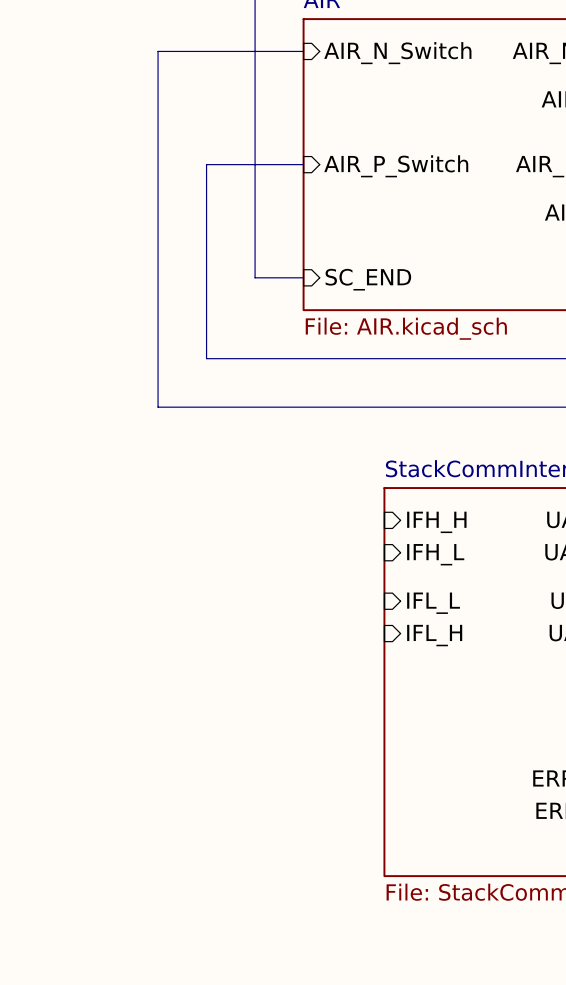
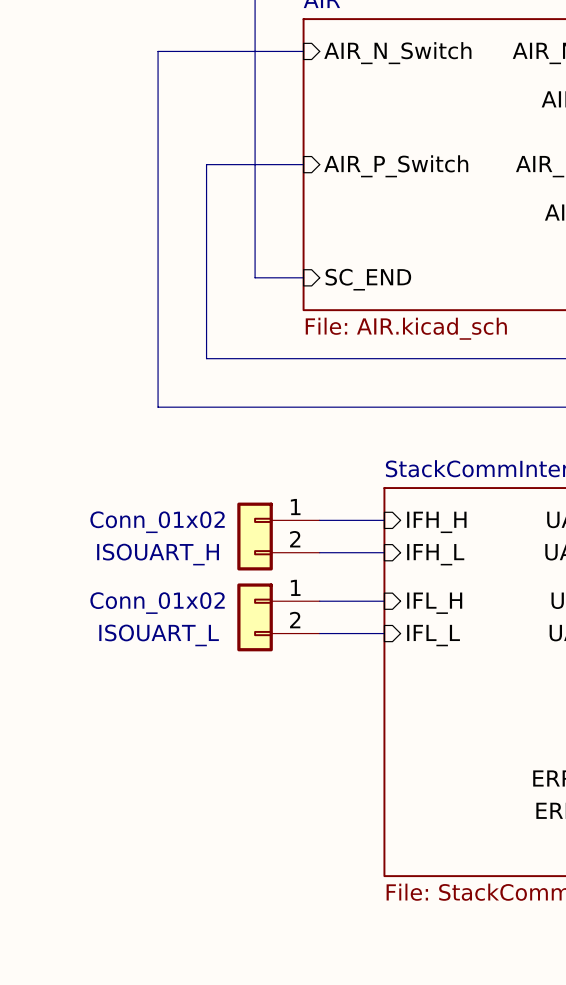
wire: none -> (319, 520) (384, 520)
ISOUART_H: none -> Conn_01x02 (278, 536)
wire: none -> (319, 552) (384, 552)
wire: none -> (319, 601) (384, 601)
sheet pin: IFL_L (433, 603) -> IFL_H (434, 603)
ISOUART_L: none -> Conn_01x02 (278, 617)
wire: none -> (319, 633) (384, 633)
sheet pin: IFL_H (434, 635) -> IFL_L (433, 635)

